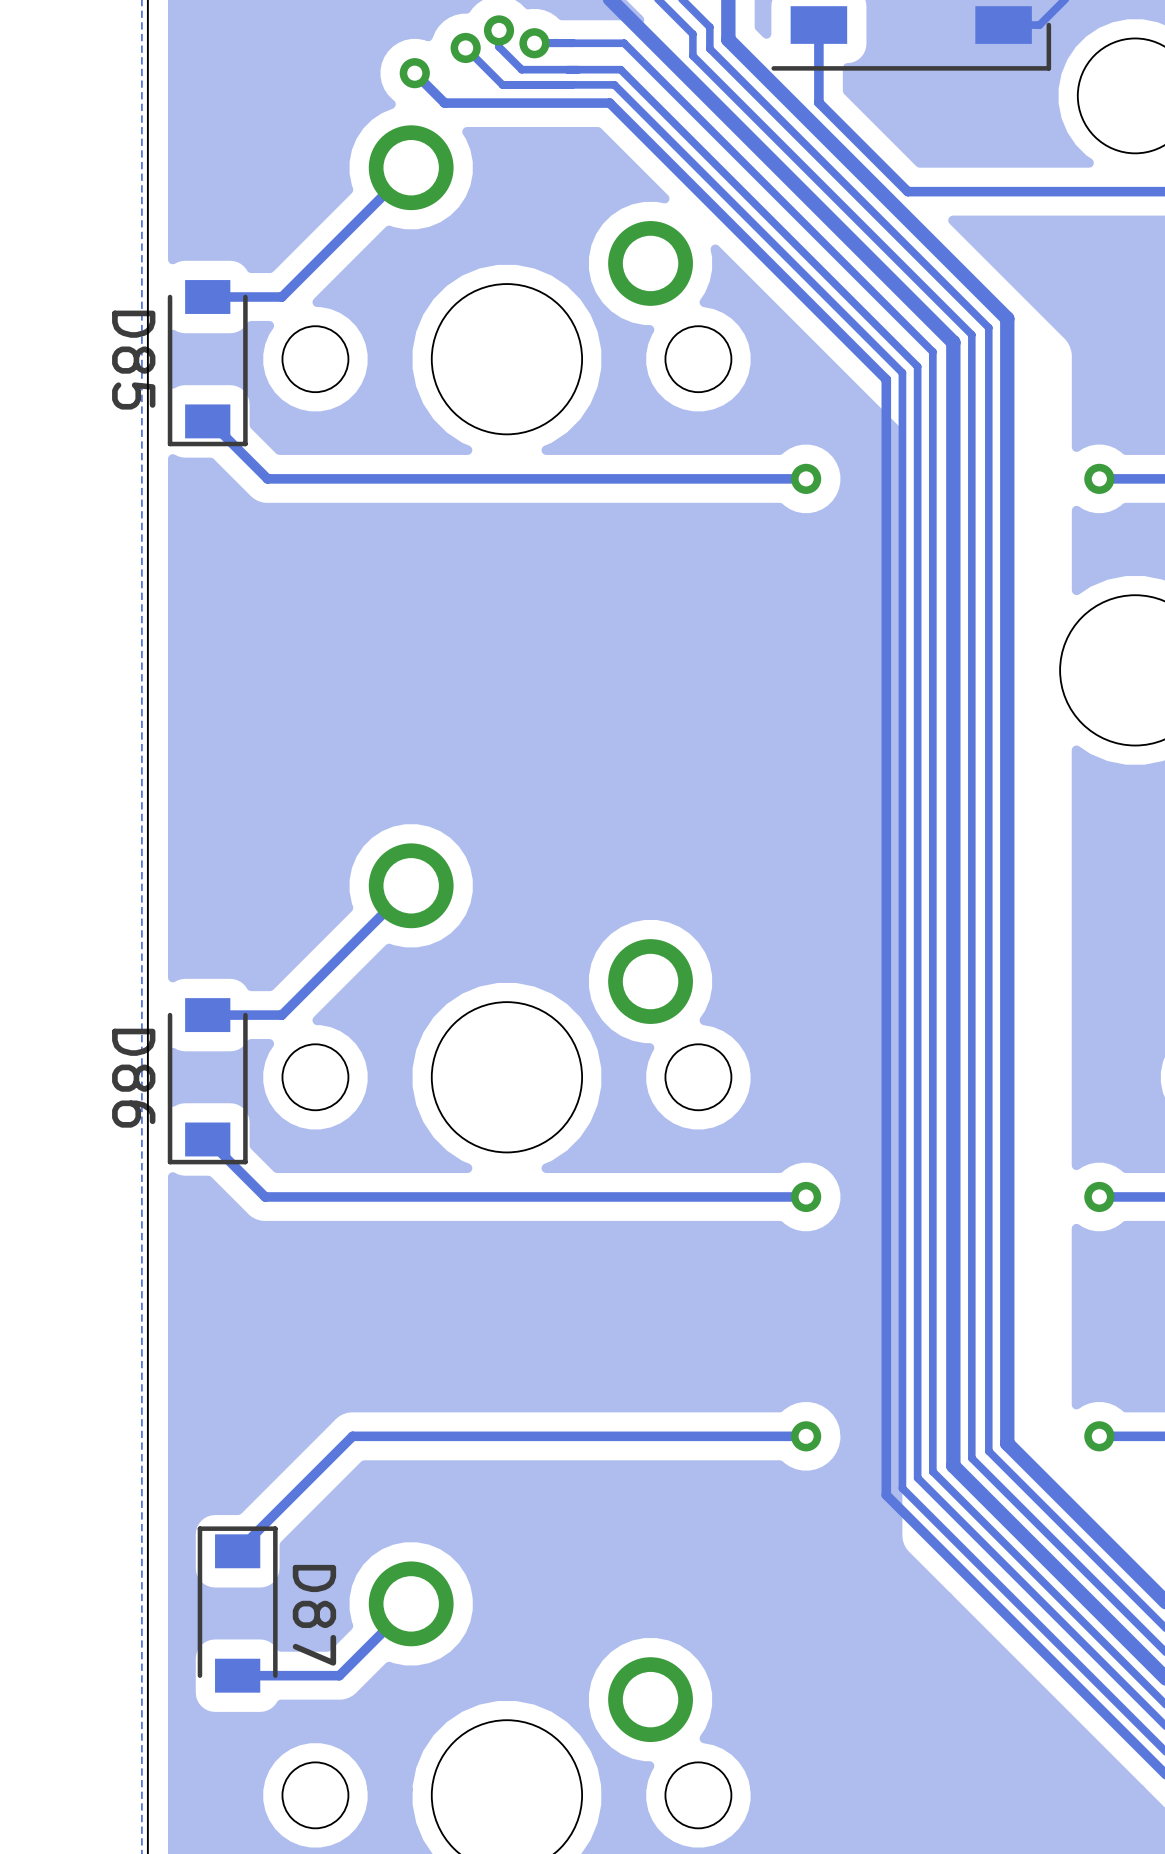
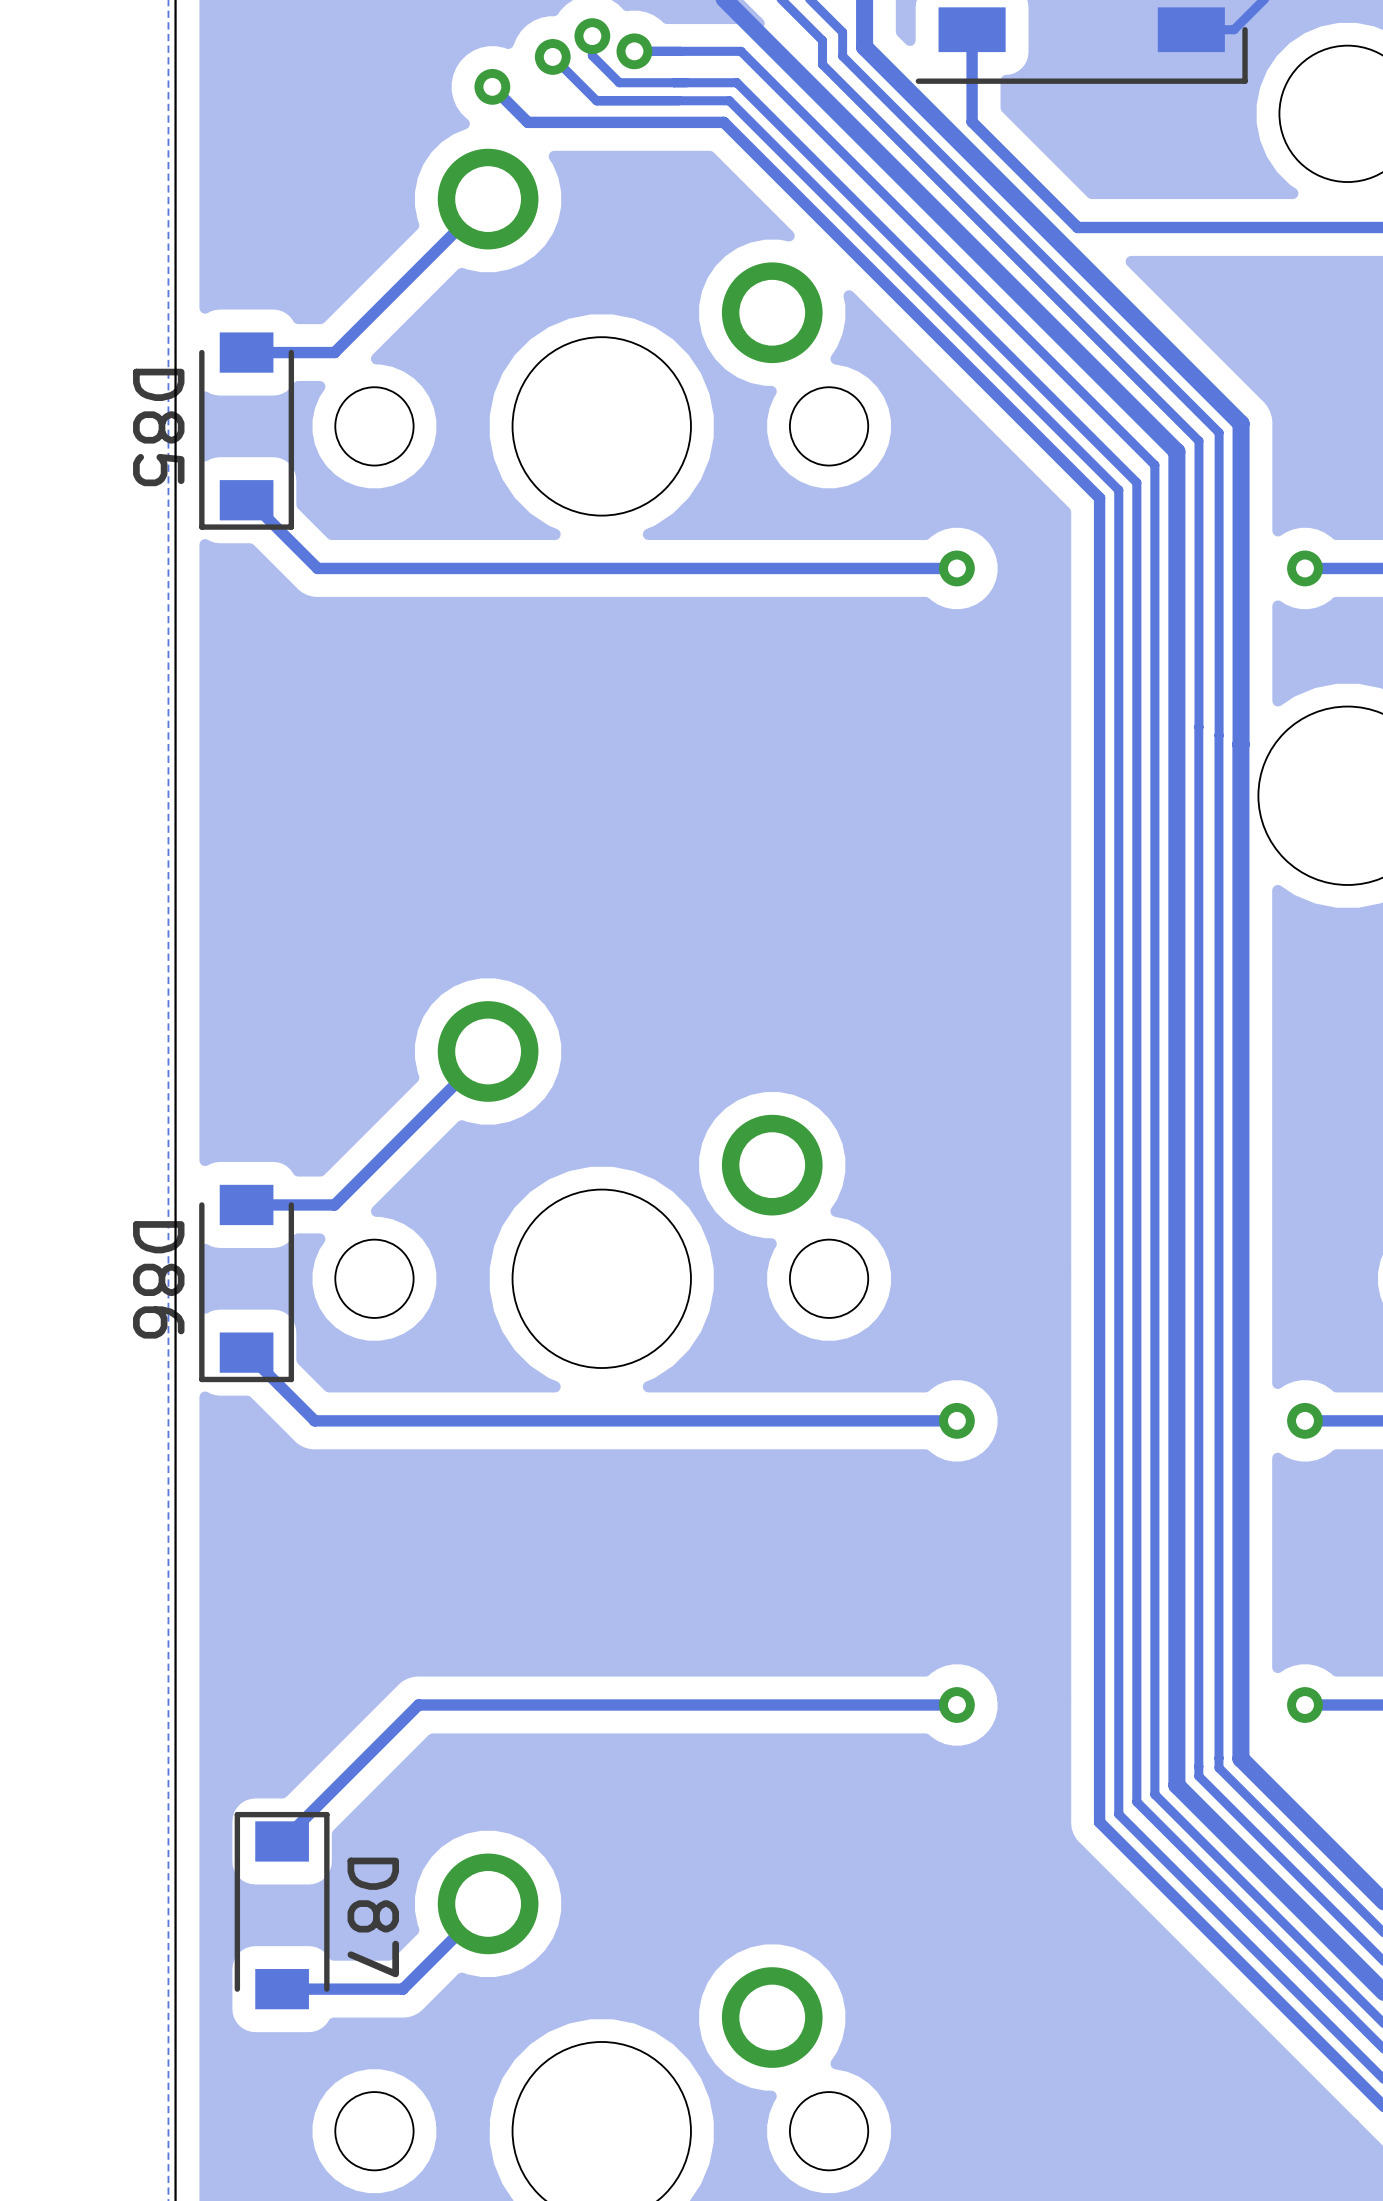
track: (709, 47) (988, 327) (988, 1451) (1026, 1489) -> (1218, 735) (1218, 1767)
track: none -> (842, 56) (1219, 432) (1219, 735)
track: (692, 54) (971, 334) (971, 1458) (1009, 1496) -> (1198, 727) (1198, 1776)
track: none -> (822, 64) (1198, 441) (1198, 726)
track: (1007, 318) (1007, 1443) (1045, 1481) -> (1240, 744) (1240, 1758)
track: none -> (1195, 378) (1241, 423) (1241, 744)
track: (953, 342) (953, 1465) (991, 1504) -> (1131, 406) (1176, 451) (1176, 1785)
track: (932, 351) (932, 1471) (972, 1511) -> (1107, 417) (1154, 465) (1154, 1794)
track: (917, 366) (917, 1477) (957, 1518) -> (1089, 435) (1136, 482) (1136, 1801)
track: (902, 372) (902, 1488) (942, 1528) -> (1071, 442) (1118, 490) (1118, 1814)
track: (886, 379) (886, 1495) (926, 1535) -> (1052, 450) (1099, 498) (1099, 1822)

